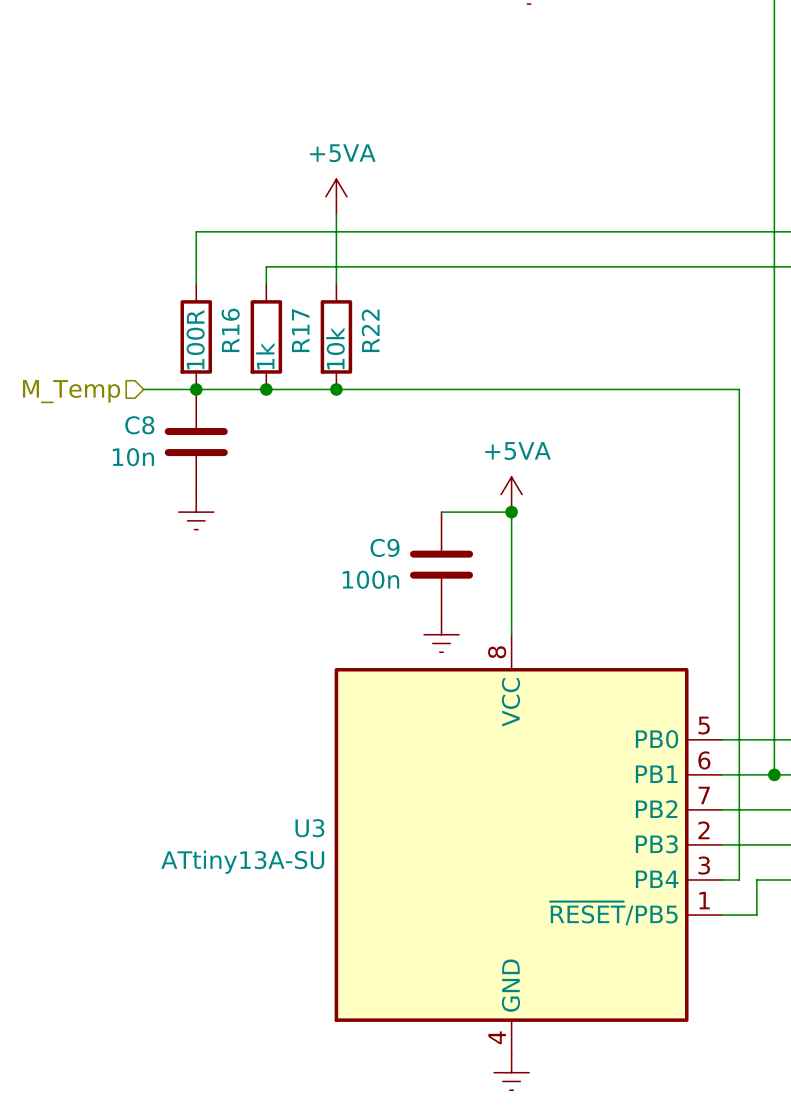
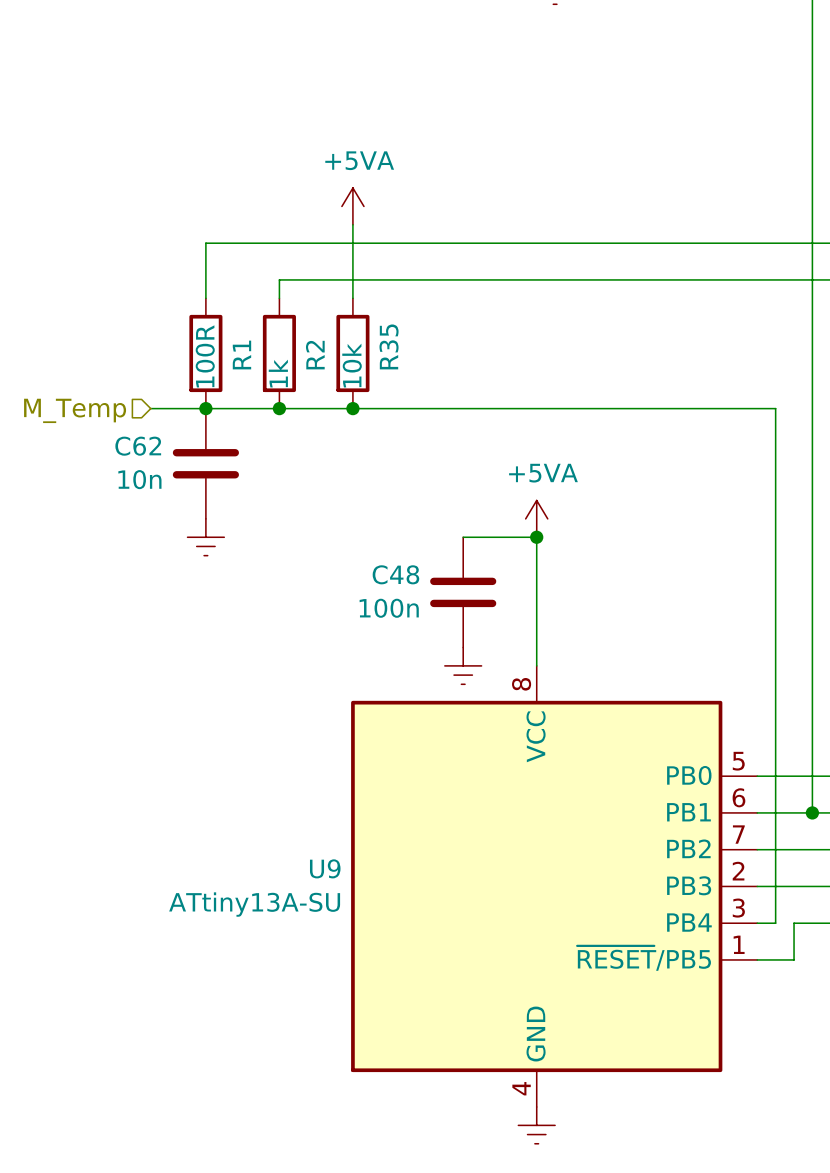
R16 name: R16 (230, 330) -> R1 (241, 355)
R17 name: R17 (300, 330) -> R2 (315, 355)
R22 name: R22 (370, 330) -> R35 (389, 346)
C8 name: C8 (139, 425) -> C62 (138, 446)
C9 name: C9 (385, 547) -> C48 (395, 574)
U3 name: U3 (309, 828) -> U9 (325, 868)

